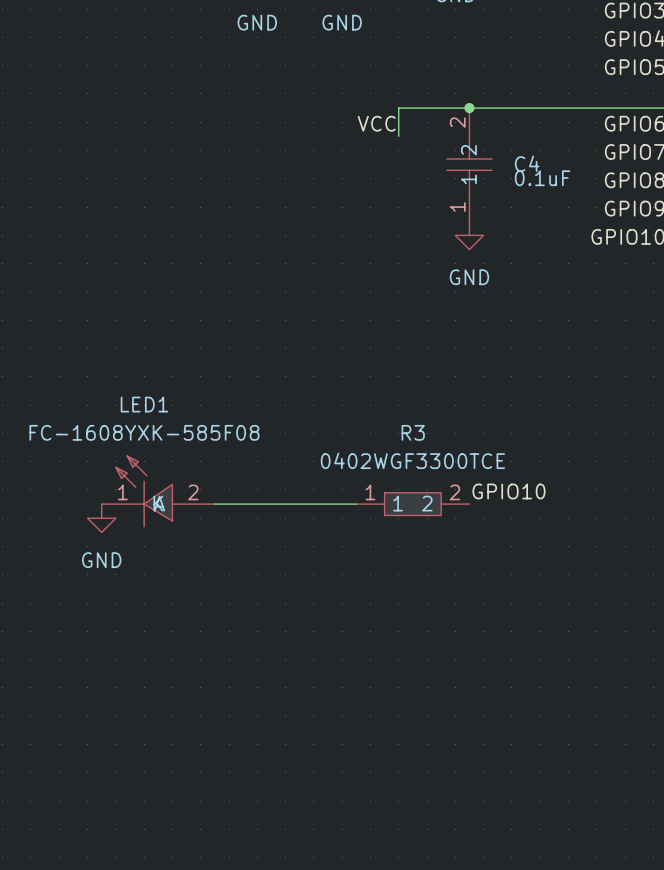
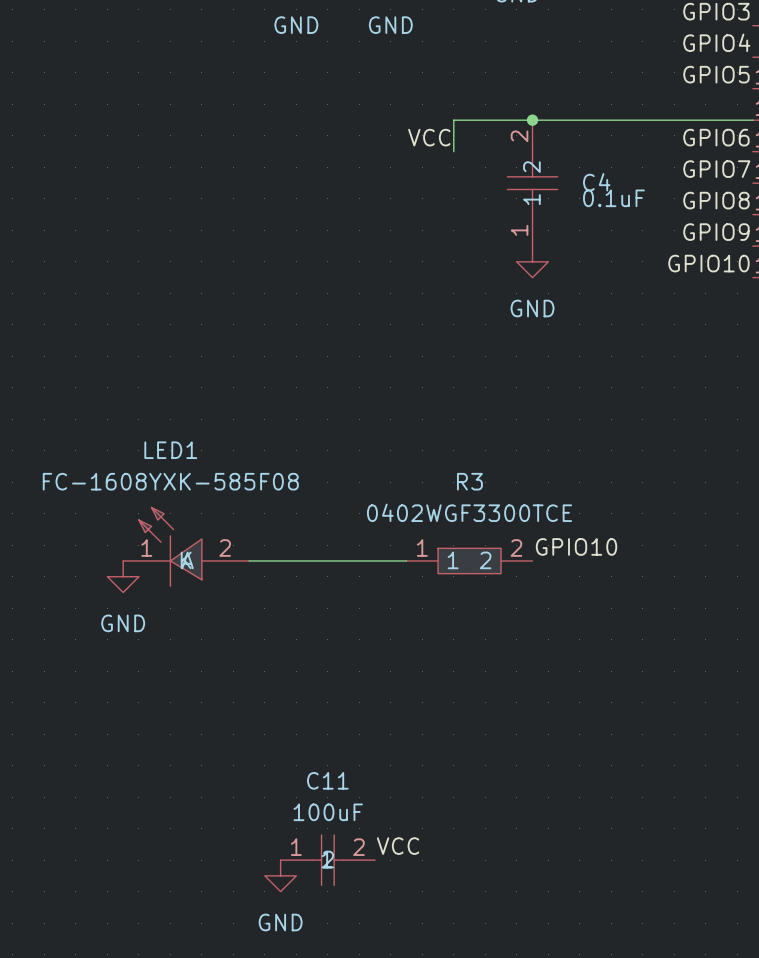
label: none -> VCC (398, 846)
C11: none -> 100uF (327, 860)
power symbol: none -> GND (280, 875)

